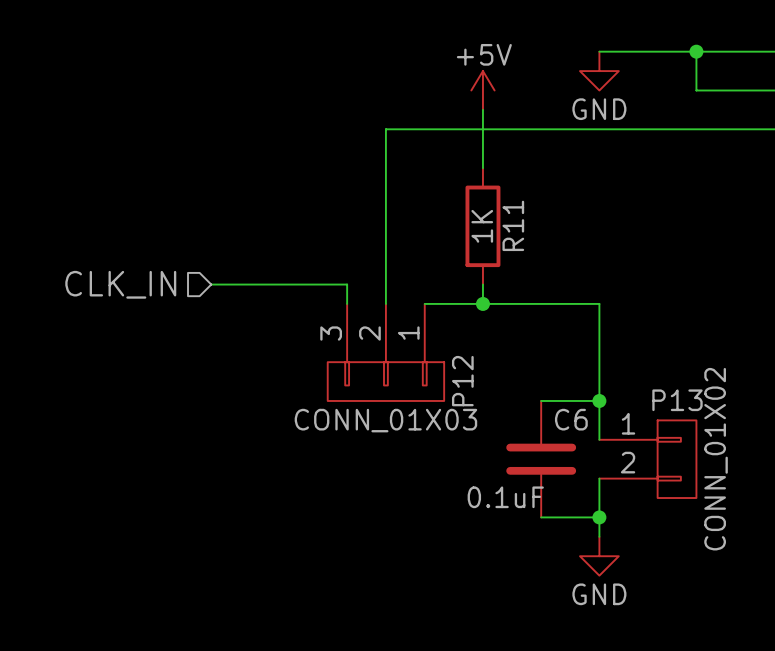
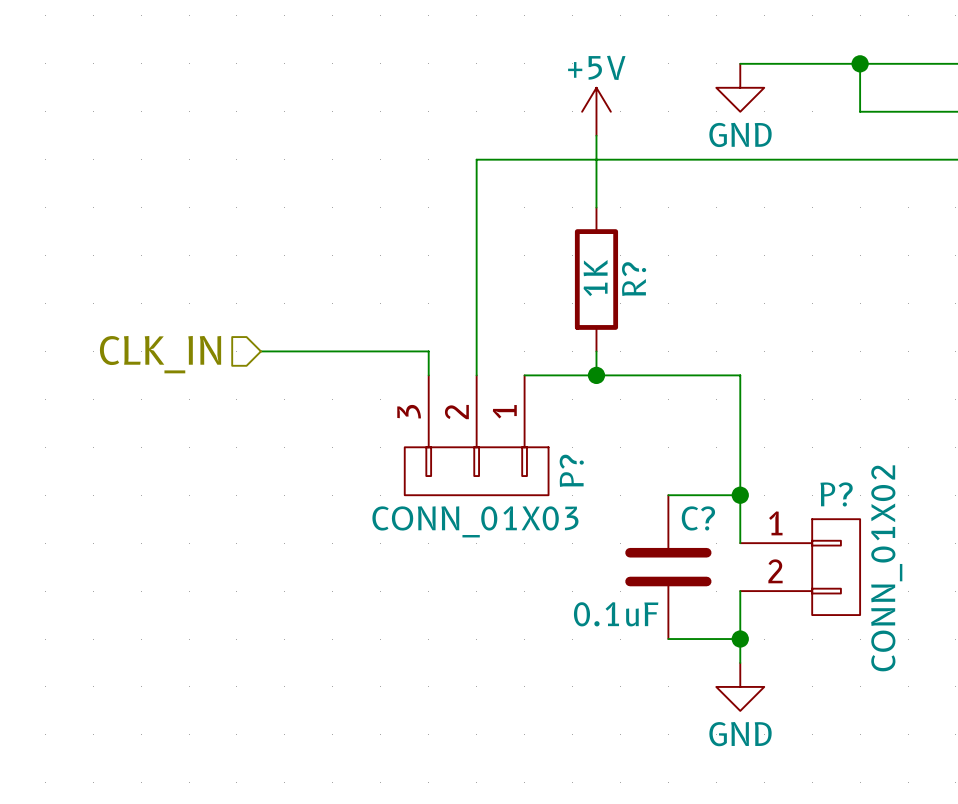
R11 name: R11 (513, 225) -> R? (634, 279)
P12 name: P12 (462, 381) -> P? (571, 470)
P13 name: P13 (677, 400) -> P? (836, 494)
C6 name: C6 (571, 419) -> C? (698, 518)

